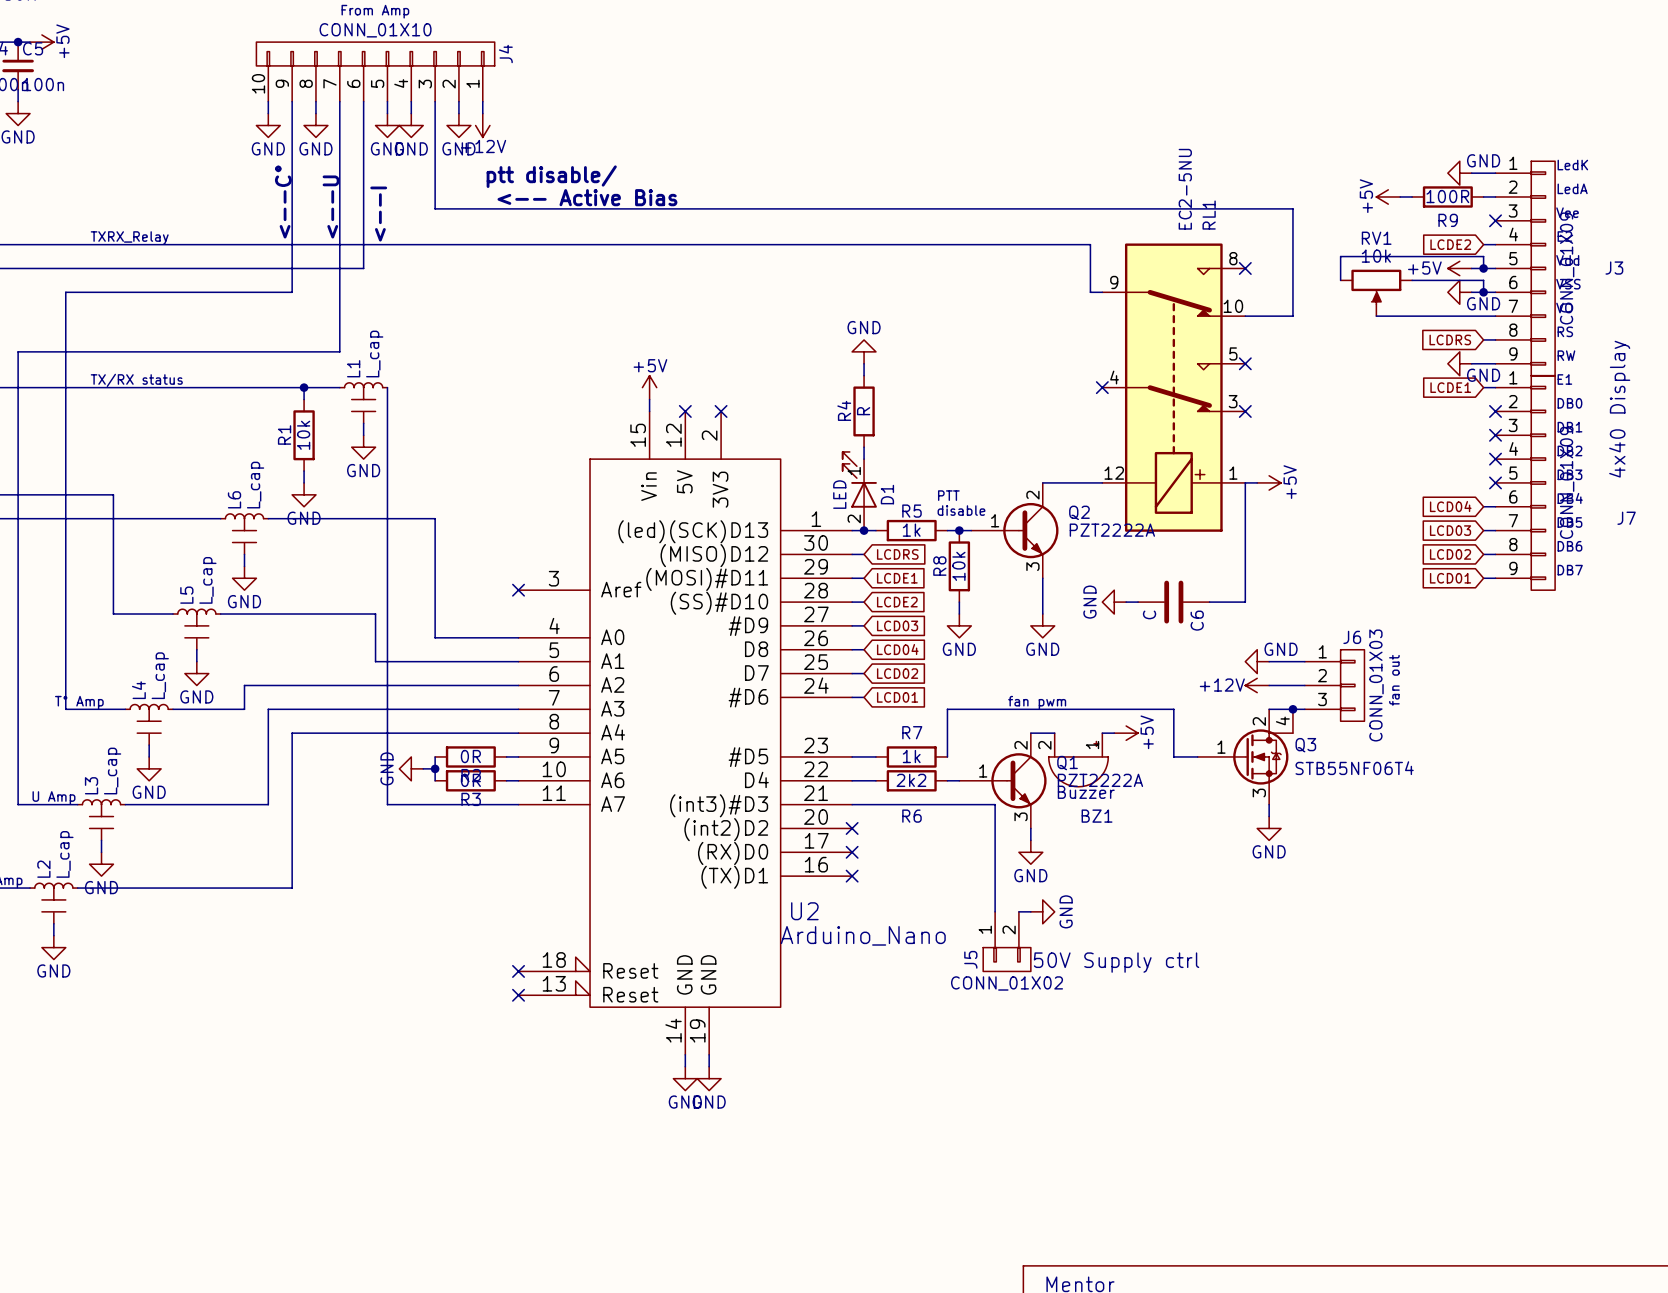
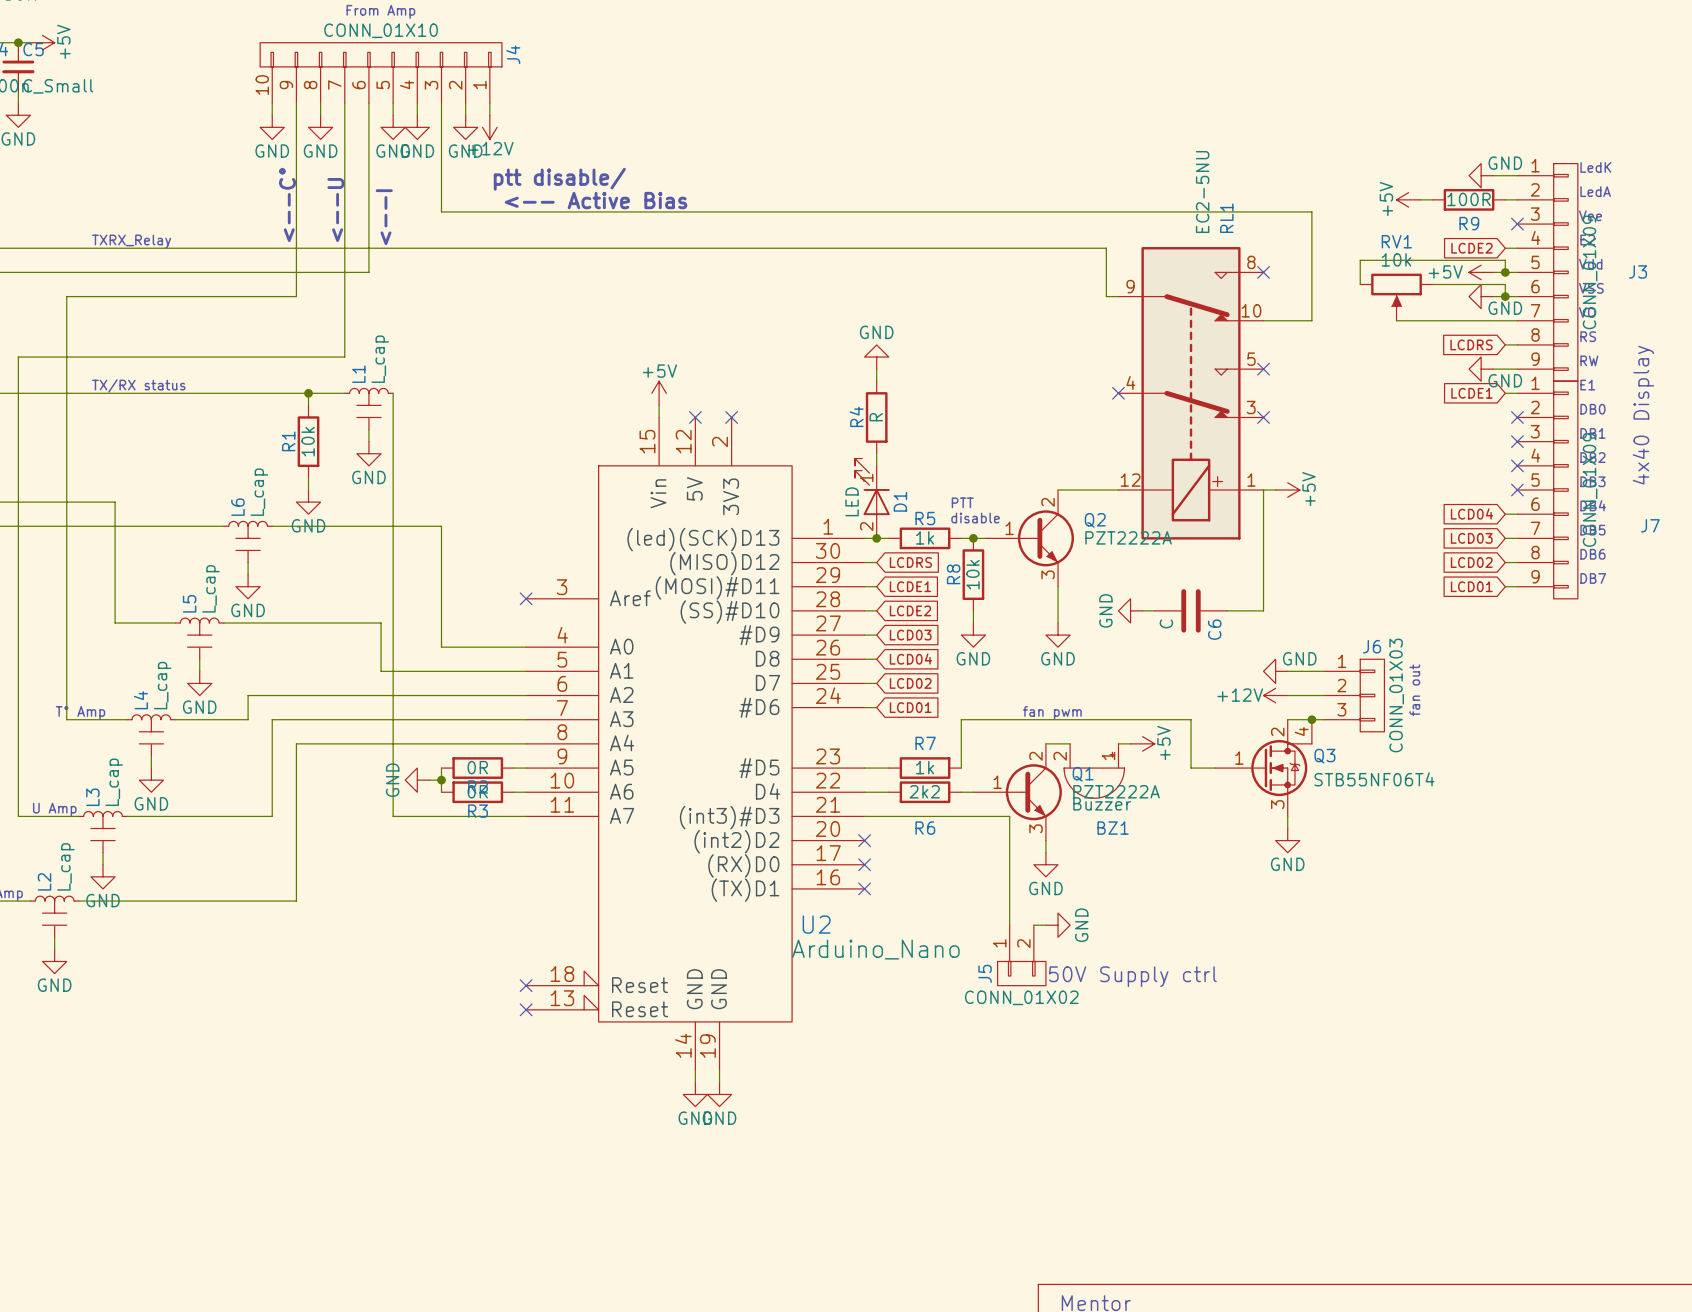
C5 value: 100n (43, 84) -> C_Small (58, 86)

